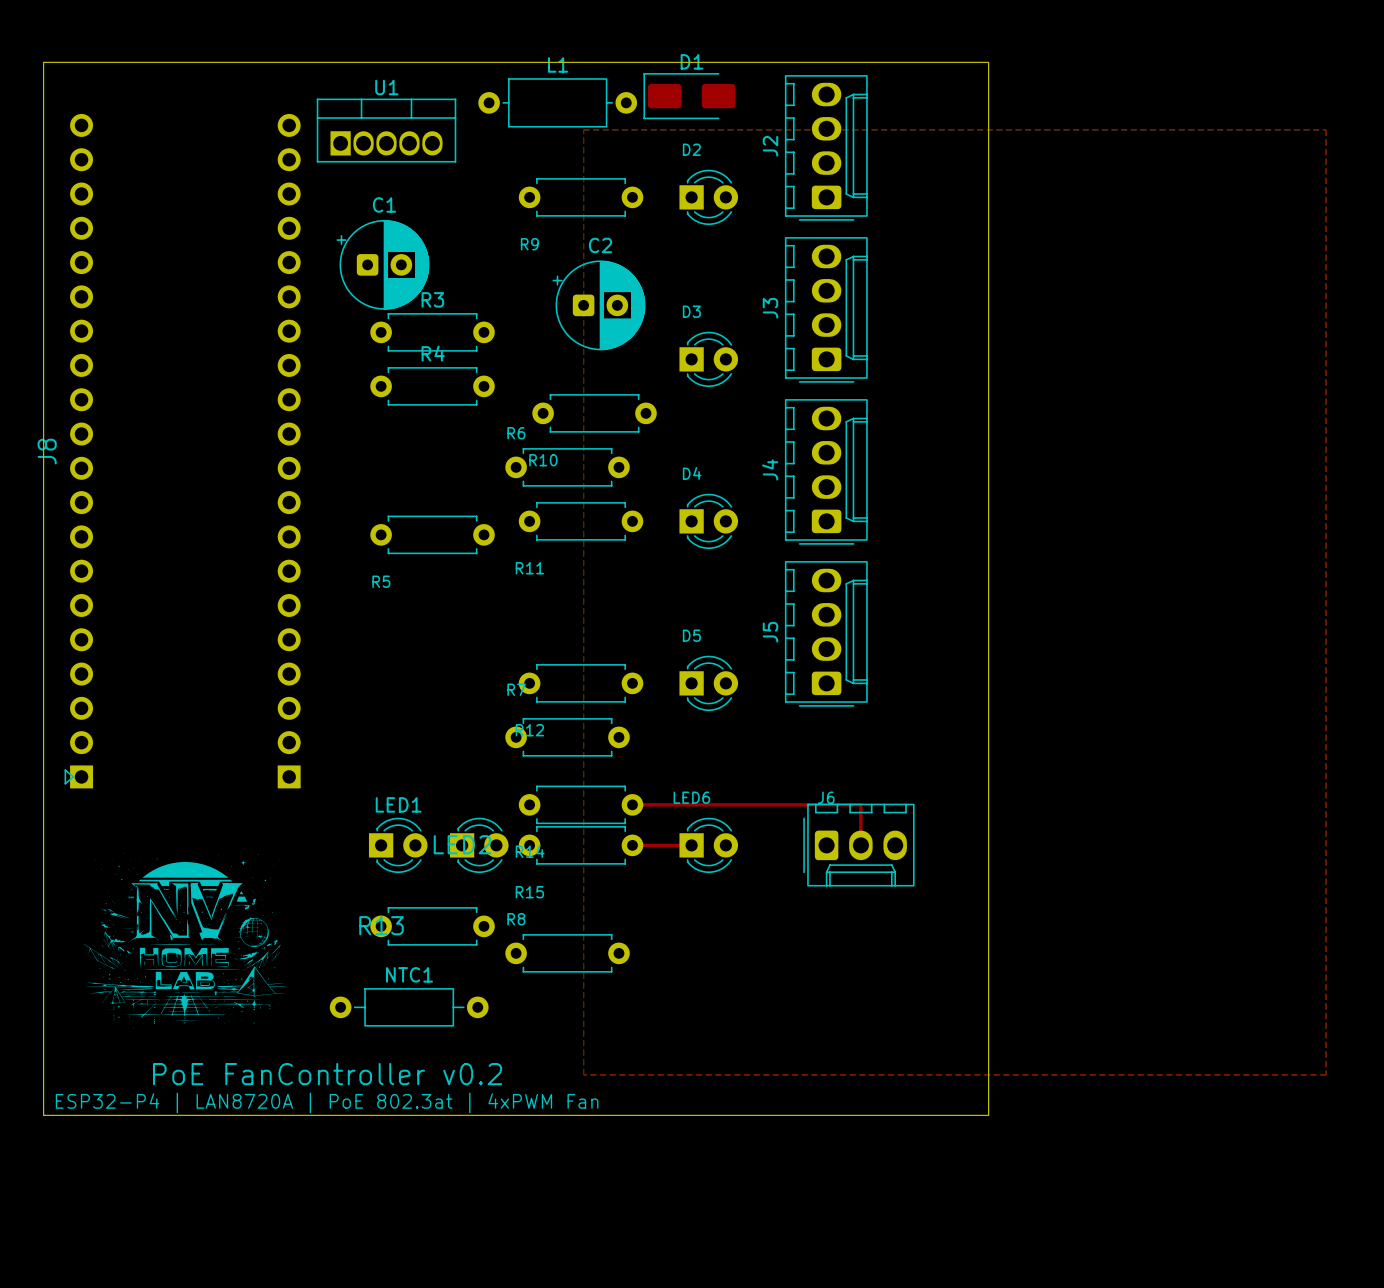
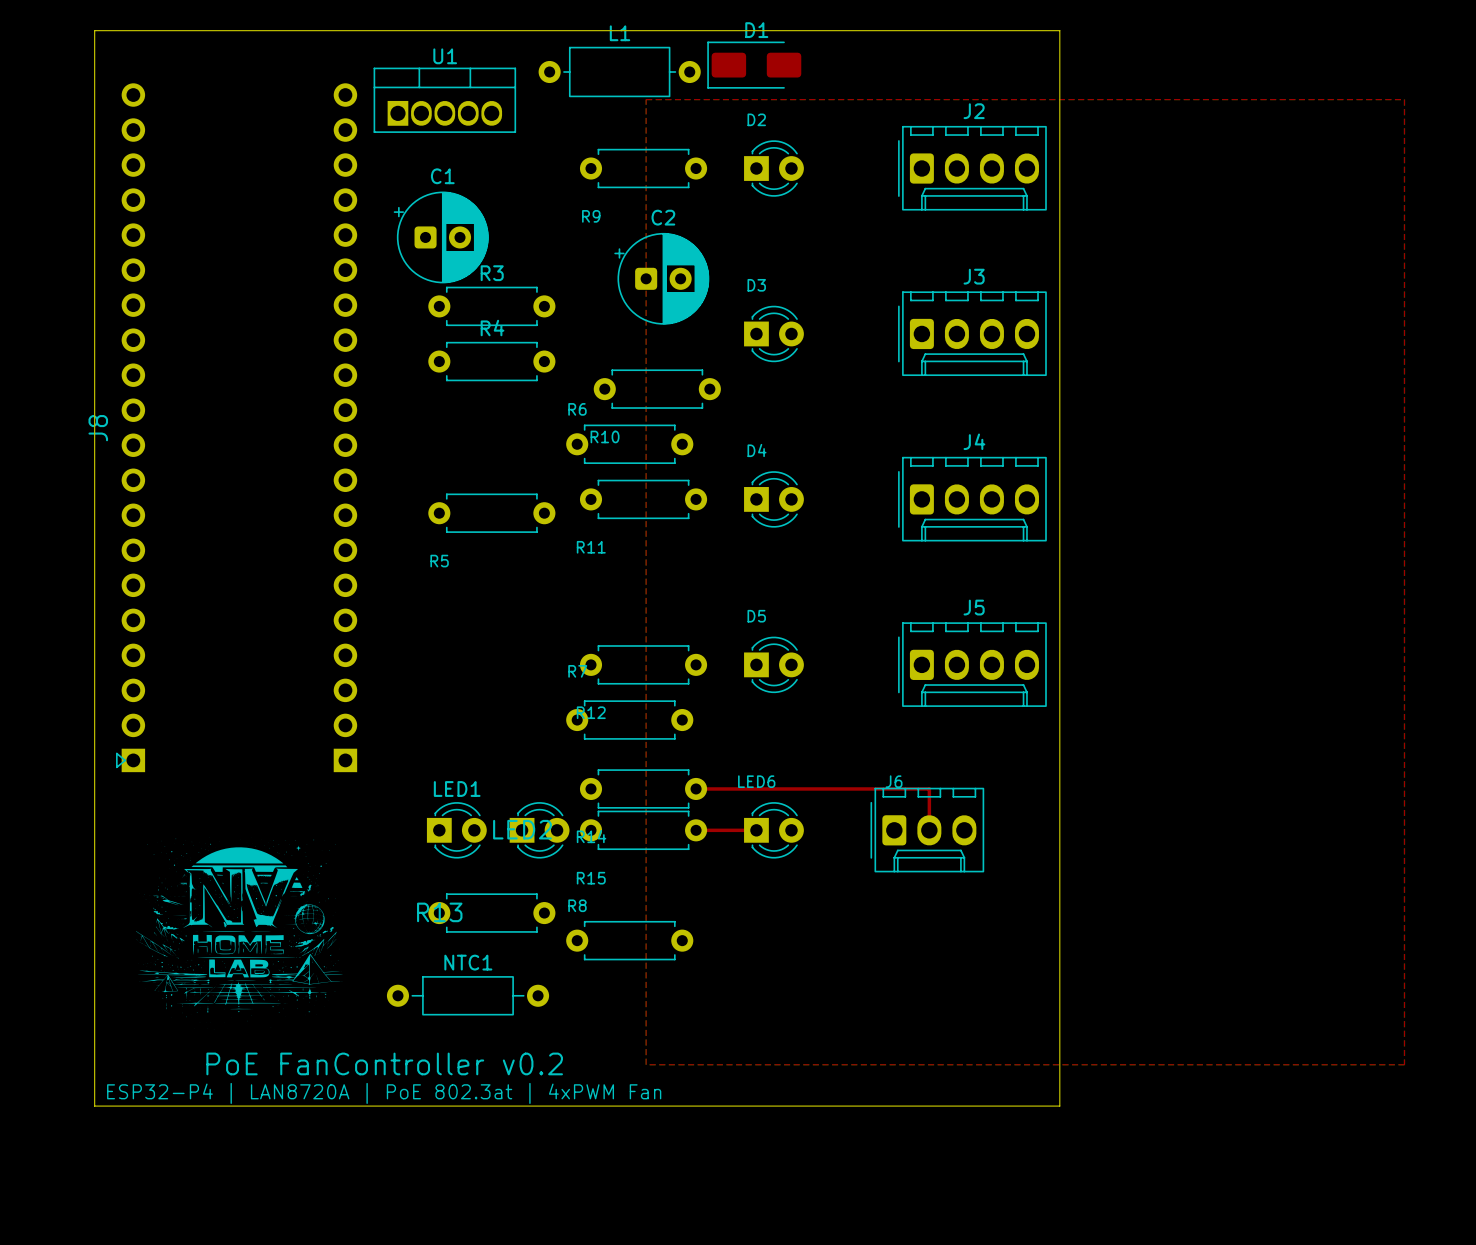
J2 rotation: 0° (826, 147) -> 90° clockwise (972, 168)
J2 position: (826, 147) -> (972, 168)
J3 rotation: 0° (826, 309) -> 90° clockwise (972, 333)
J3 position: (826, 309) -> (972, 333)
J4 rotation: 0° (826, 471) -> 90° clockwise (972, 499)
J4 position: (826, 471) -> (972, 499)
J5 rotation: 0° (826, 633) -> 90° clockwise (972, 664)
J5 position: (826, 633) -> (972, 664)

